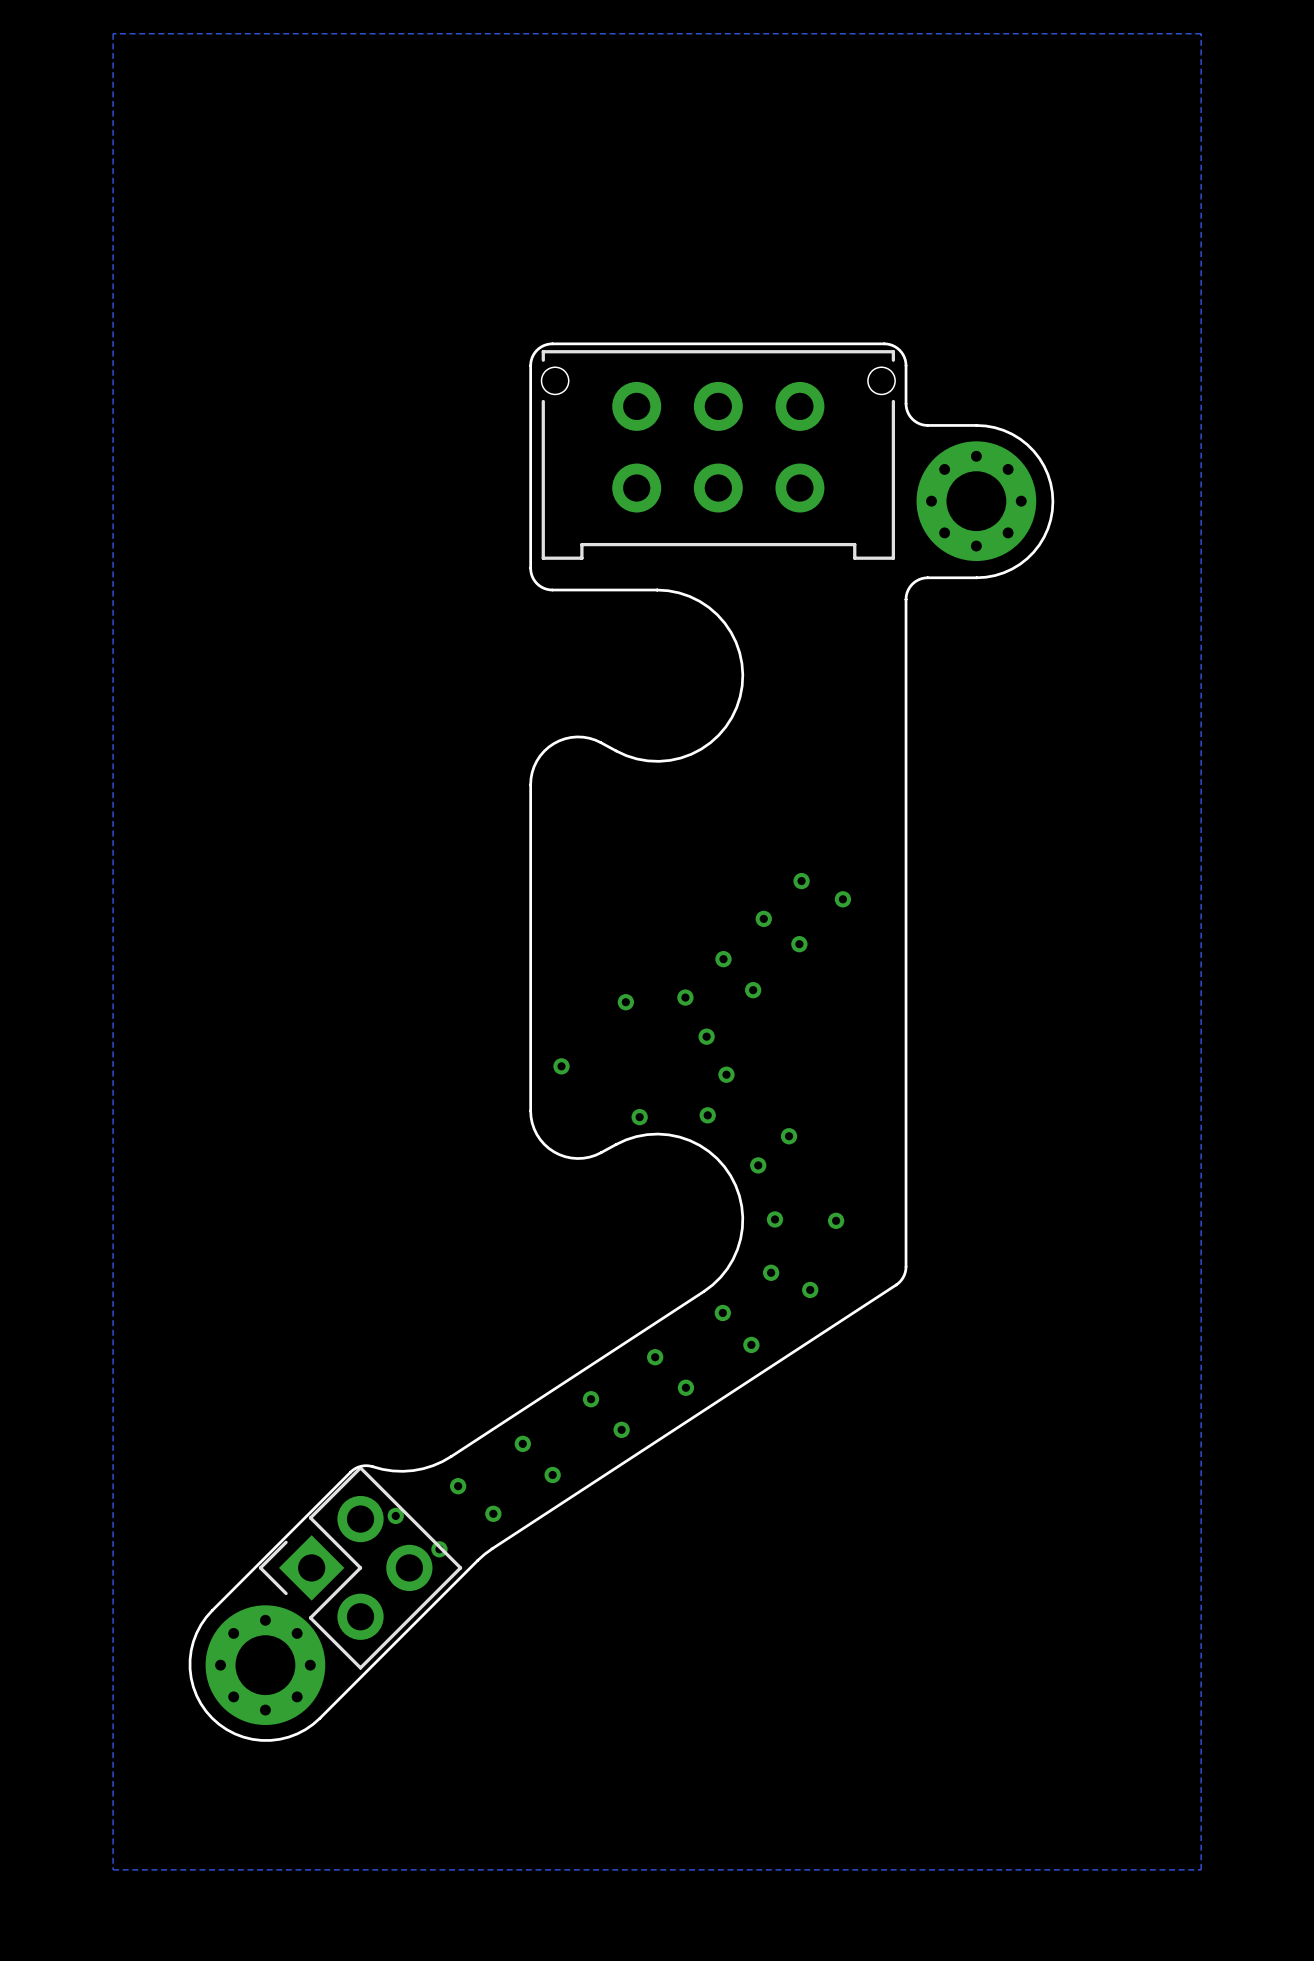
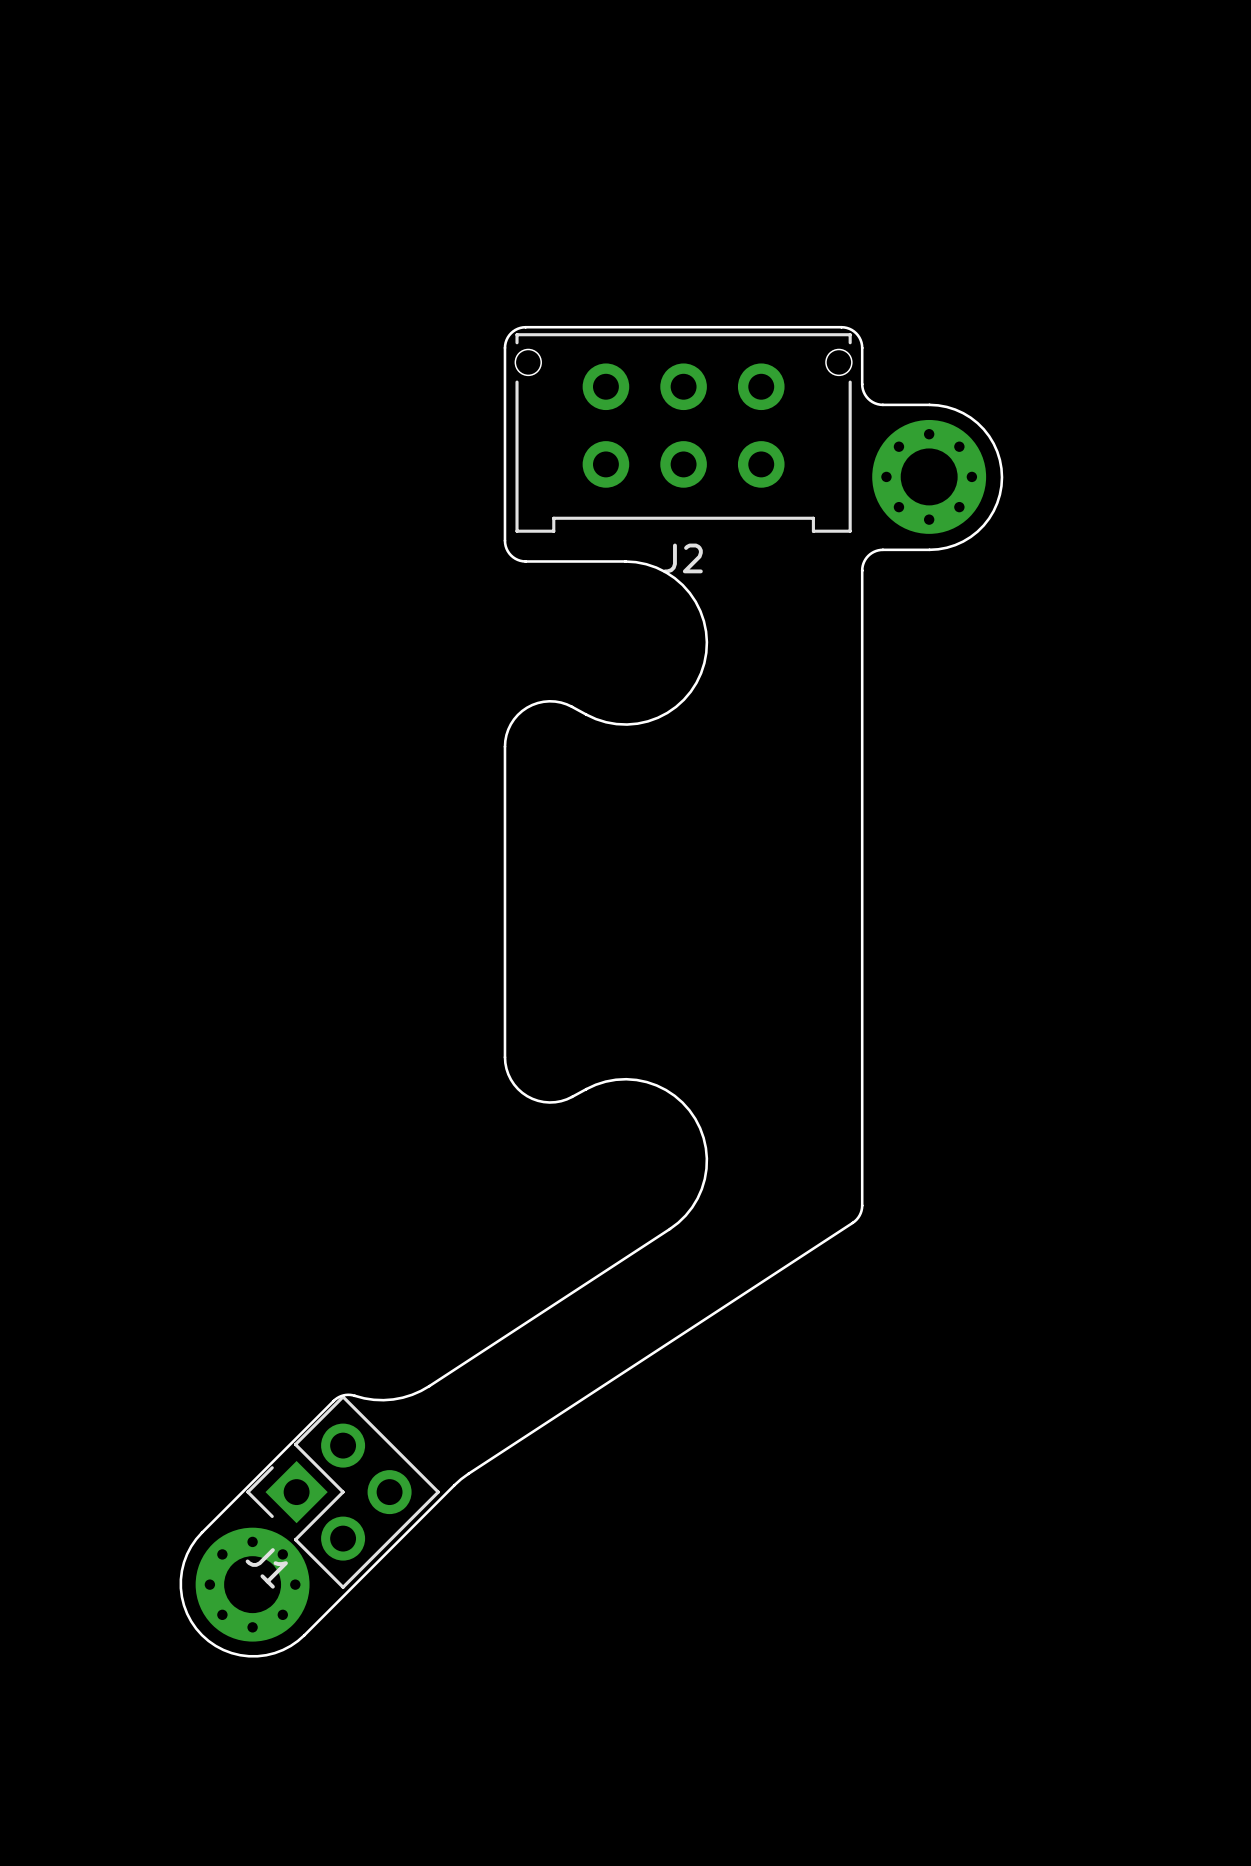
zone outline: (1201, 33) (113, 33) (113, 1869) (1201, 1869) (1201, 33) -> none
J2 name: none -> J2 (682, 558)
via: (801, 881) -> none
via: (842, 899) -> none
via: (763, 918) -> none
via: (799, 944) -> none
via: (723, 959) -> none
via: (753, 990) -> none
via: (685, 997) -> none
via: (625, 1002) -> none
via: (706, 1036) -> none
via: (561, 1066) -> none
via: (726, 1074) -> none
via: (707, 1115) -> none
via: (639, 1117) -> none
via: (789, 1136) -> none
via: (758, 1165) -> none
via: (774, 1219) -> none
via: (836, 1220) -> none
via: (771, 1272) -> none
via: (810, 1289) -> none
via: (722, 1312) -> none
via: (751, 1344) -> none
via: (655, 1357) -> none
via: (685, 1387) -> none
via: (591, 1399) -> none
via: (621, 1429) -> none
via: (522, 1443) -> none
via: (552, 1475) -> none
via: (458, 1486) -> none
via: (493, 1513) -> none
via: (395, 1515) -> none
via: (439, 1549) -> none
J1 name: none -> J1 (266, 1568)

